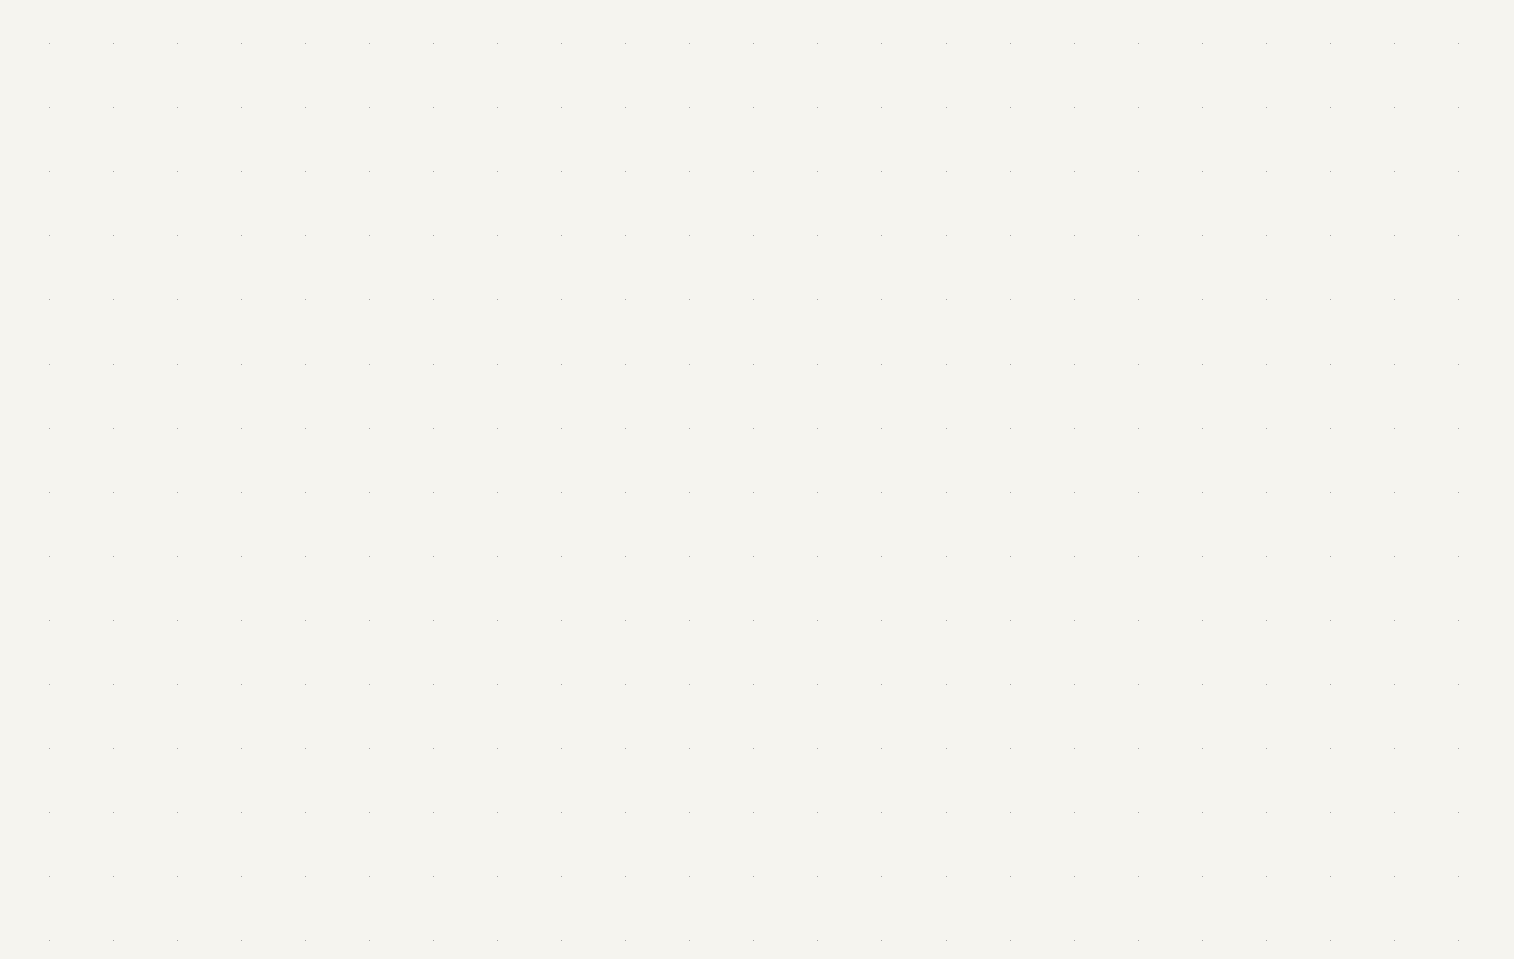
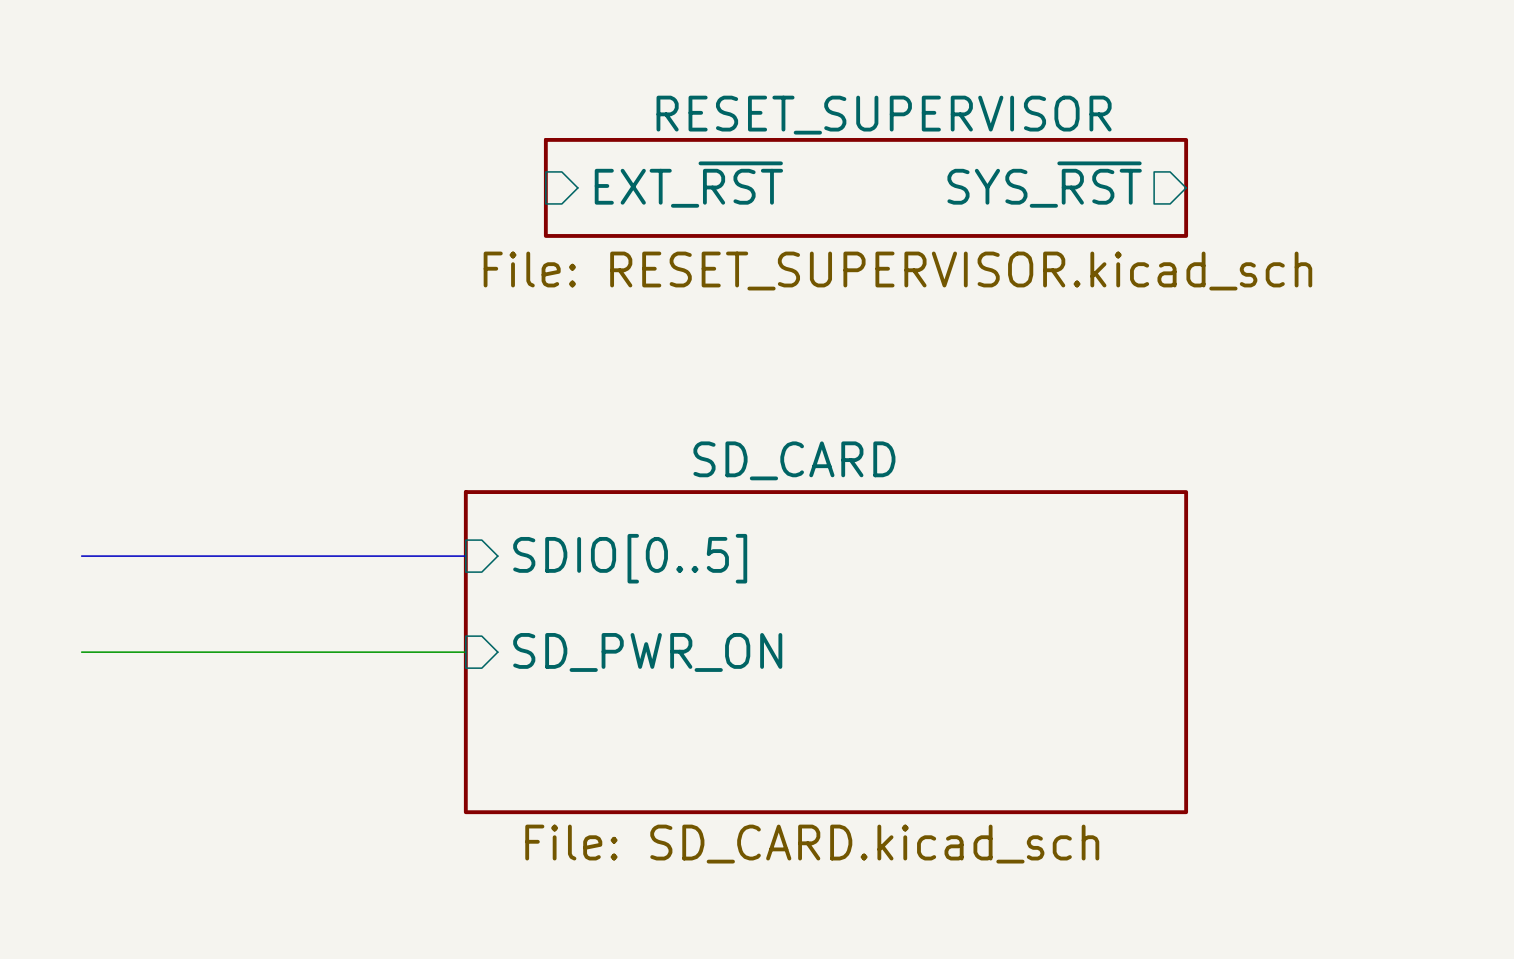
sheet pin: none -> EXT_~{RST} (688, 184)
sheet pin: none -> SYS_~{RST} (1044, 184)
sheet RESET_SUPERVISOR: none -> File: RESET_SUPERVISOR.kicad_sch (865, 187)
bus: none -> (81, 556) (465, 556)
sheet pin: none -> SDIO[0..5] (630, 558)
wire: none -> (81, 652) (465, 652)
sheet pin: none -> SD_PWR_ON (647, 652)
sheet SD_CARD: none -> File: SD_CARD.kicad_sch (825, 652)

